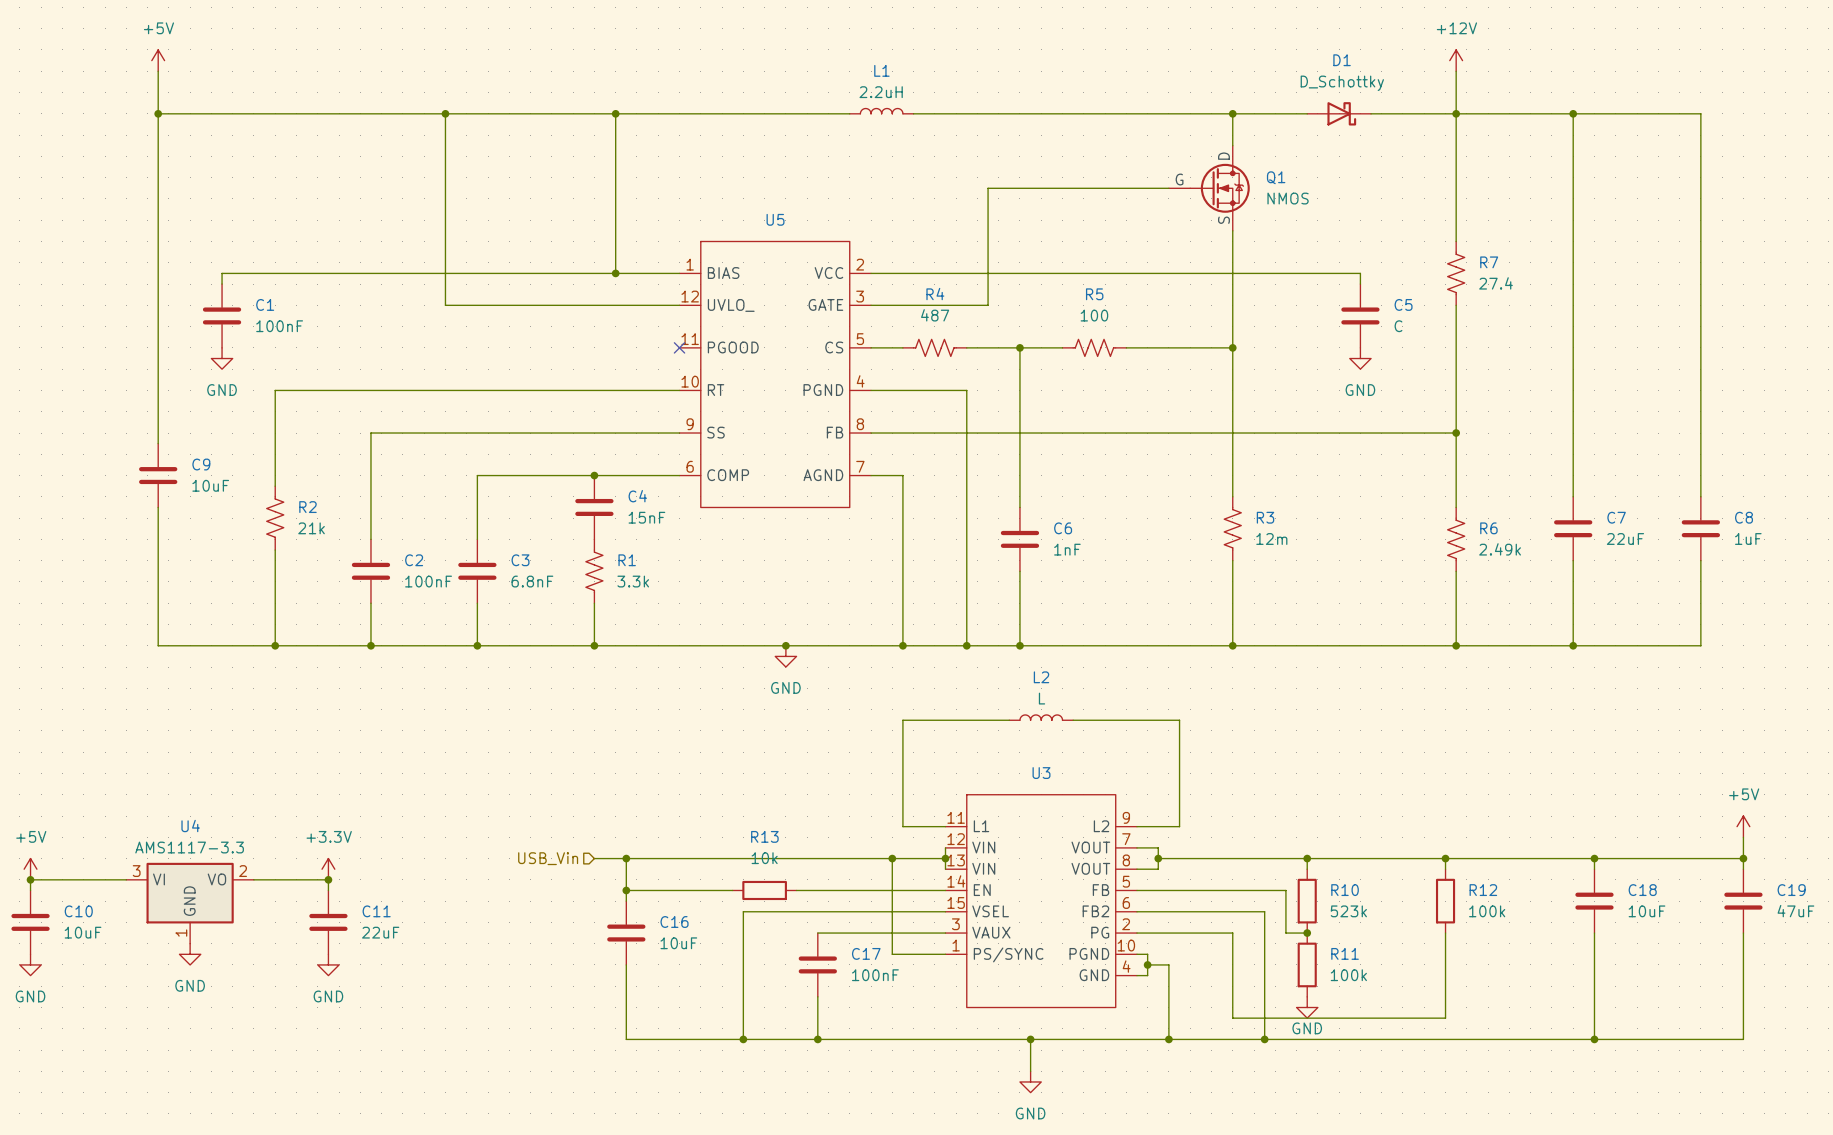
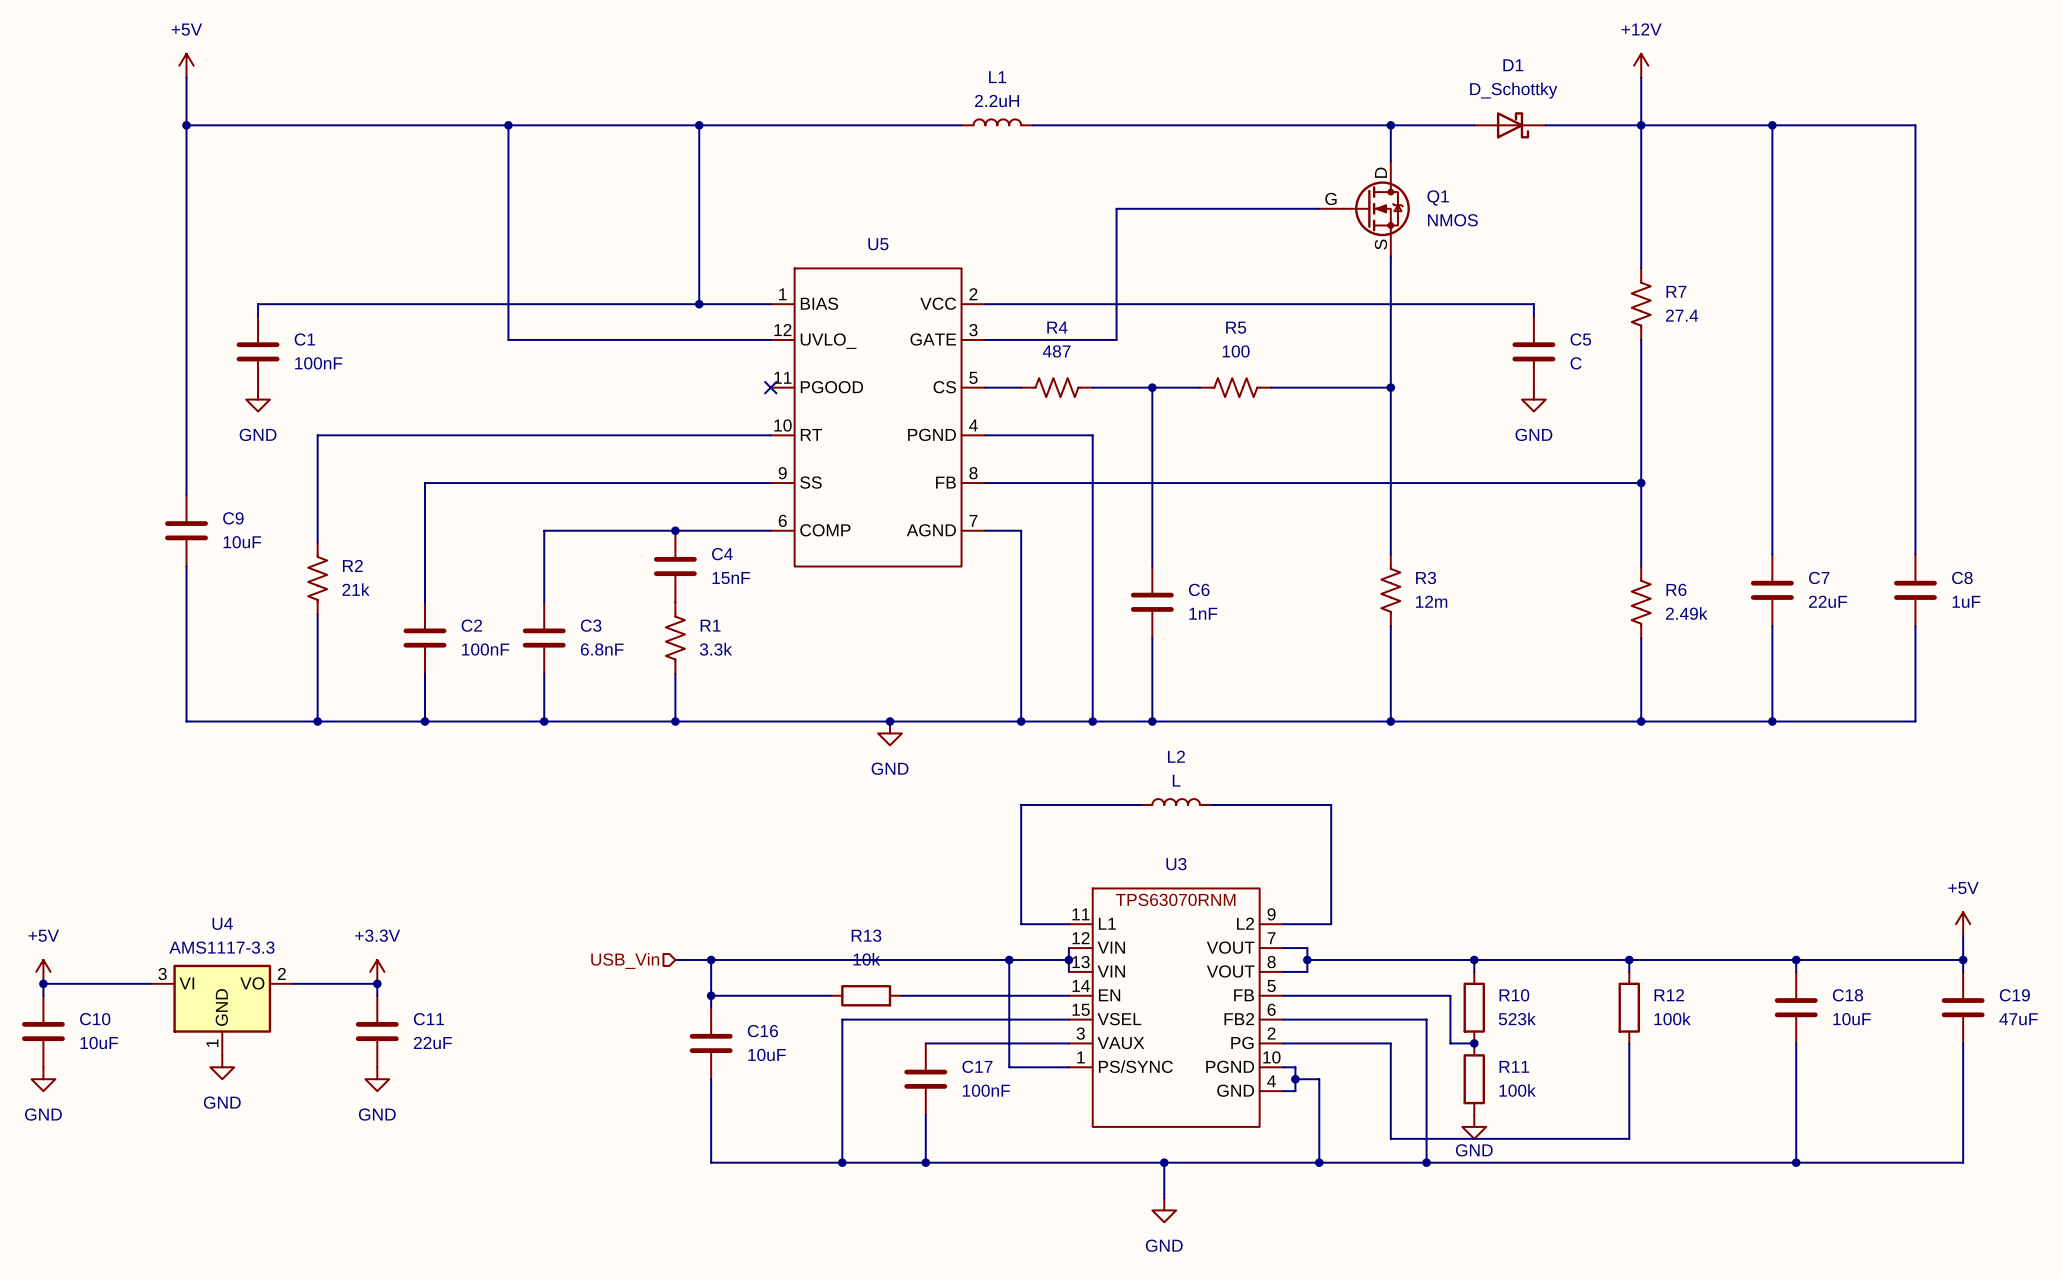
U3 text: none -> TPS63070RNM (1175, 899)

